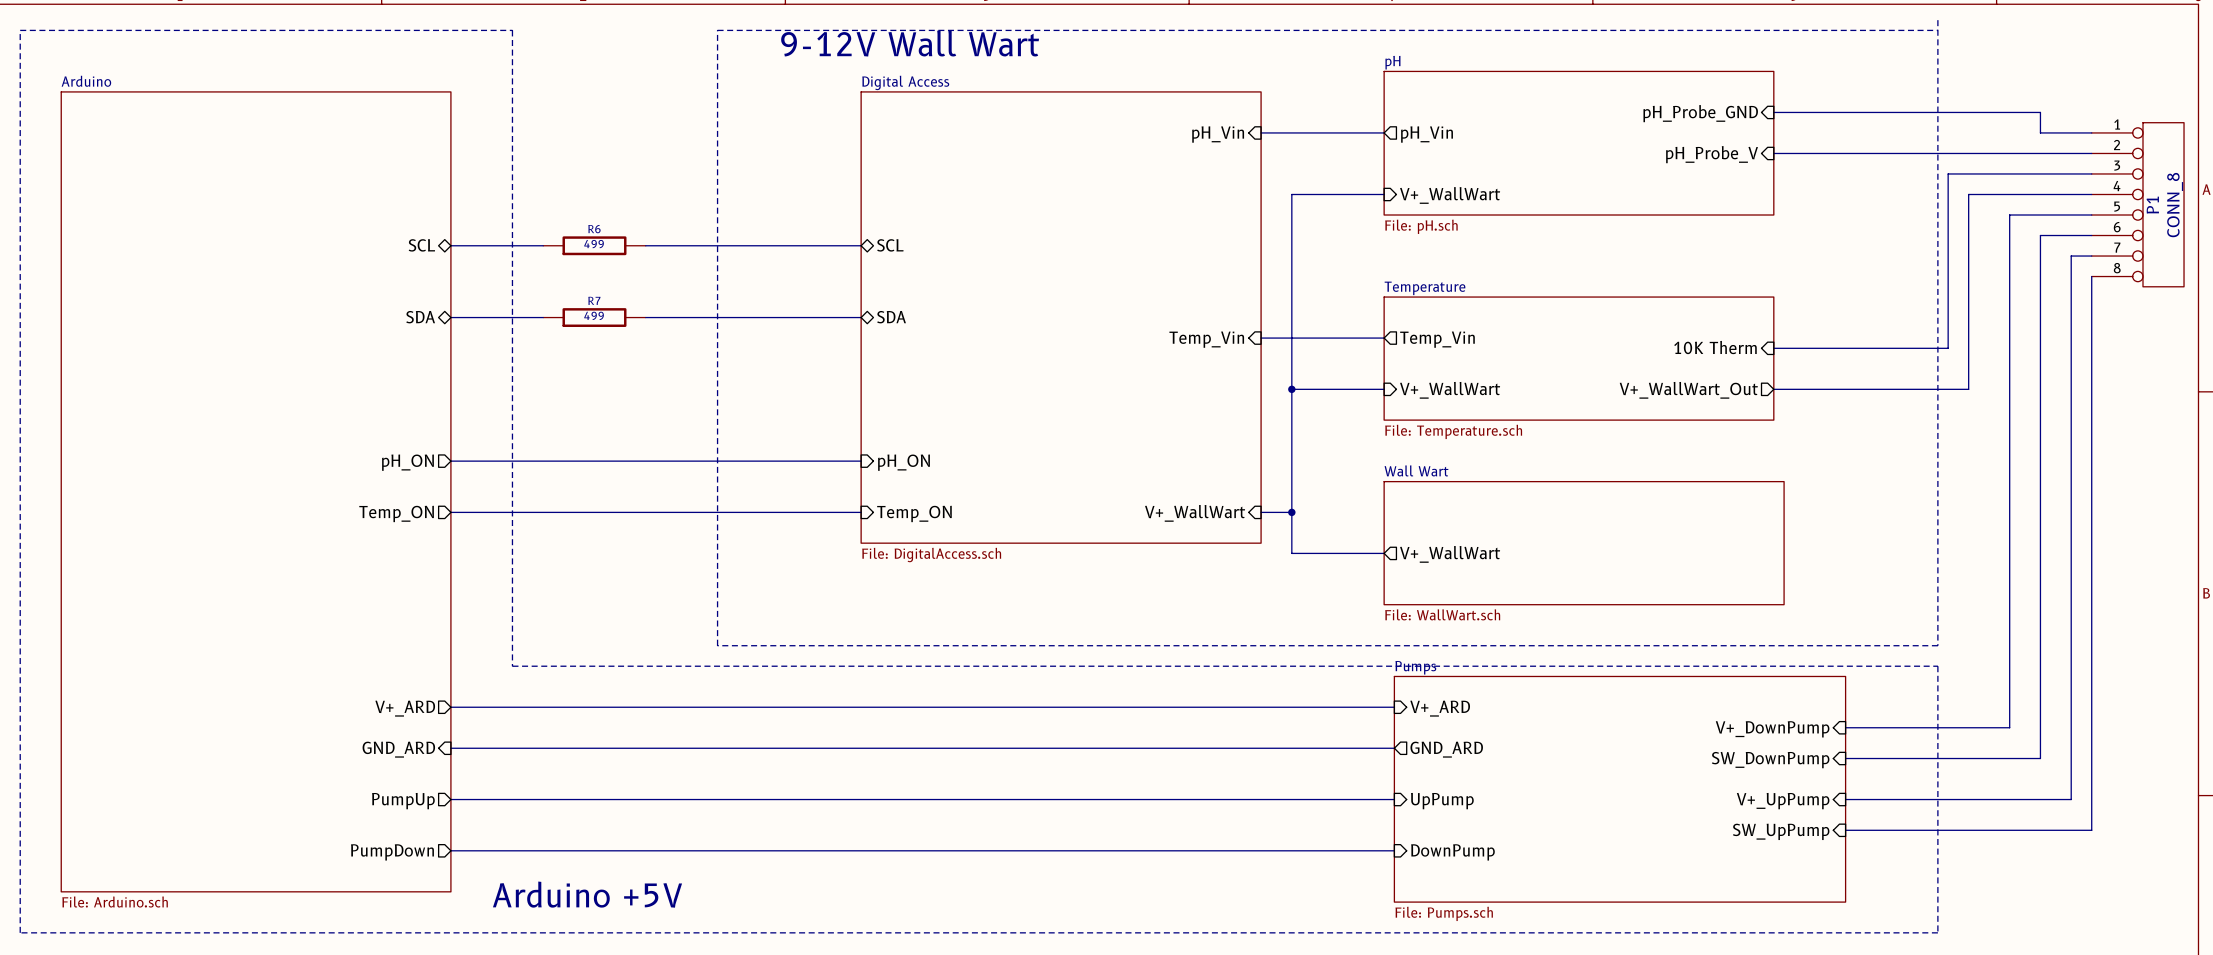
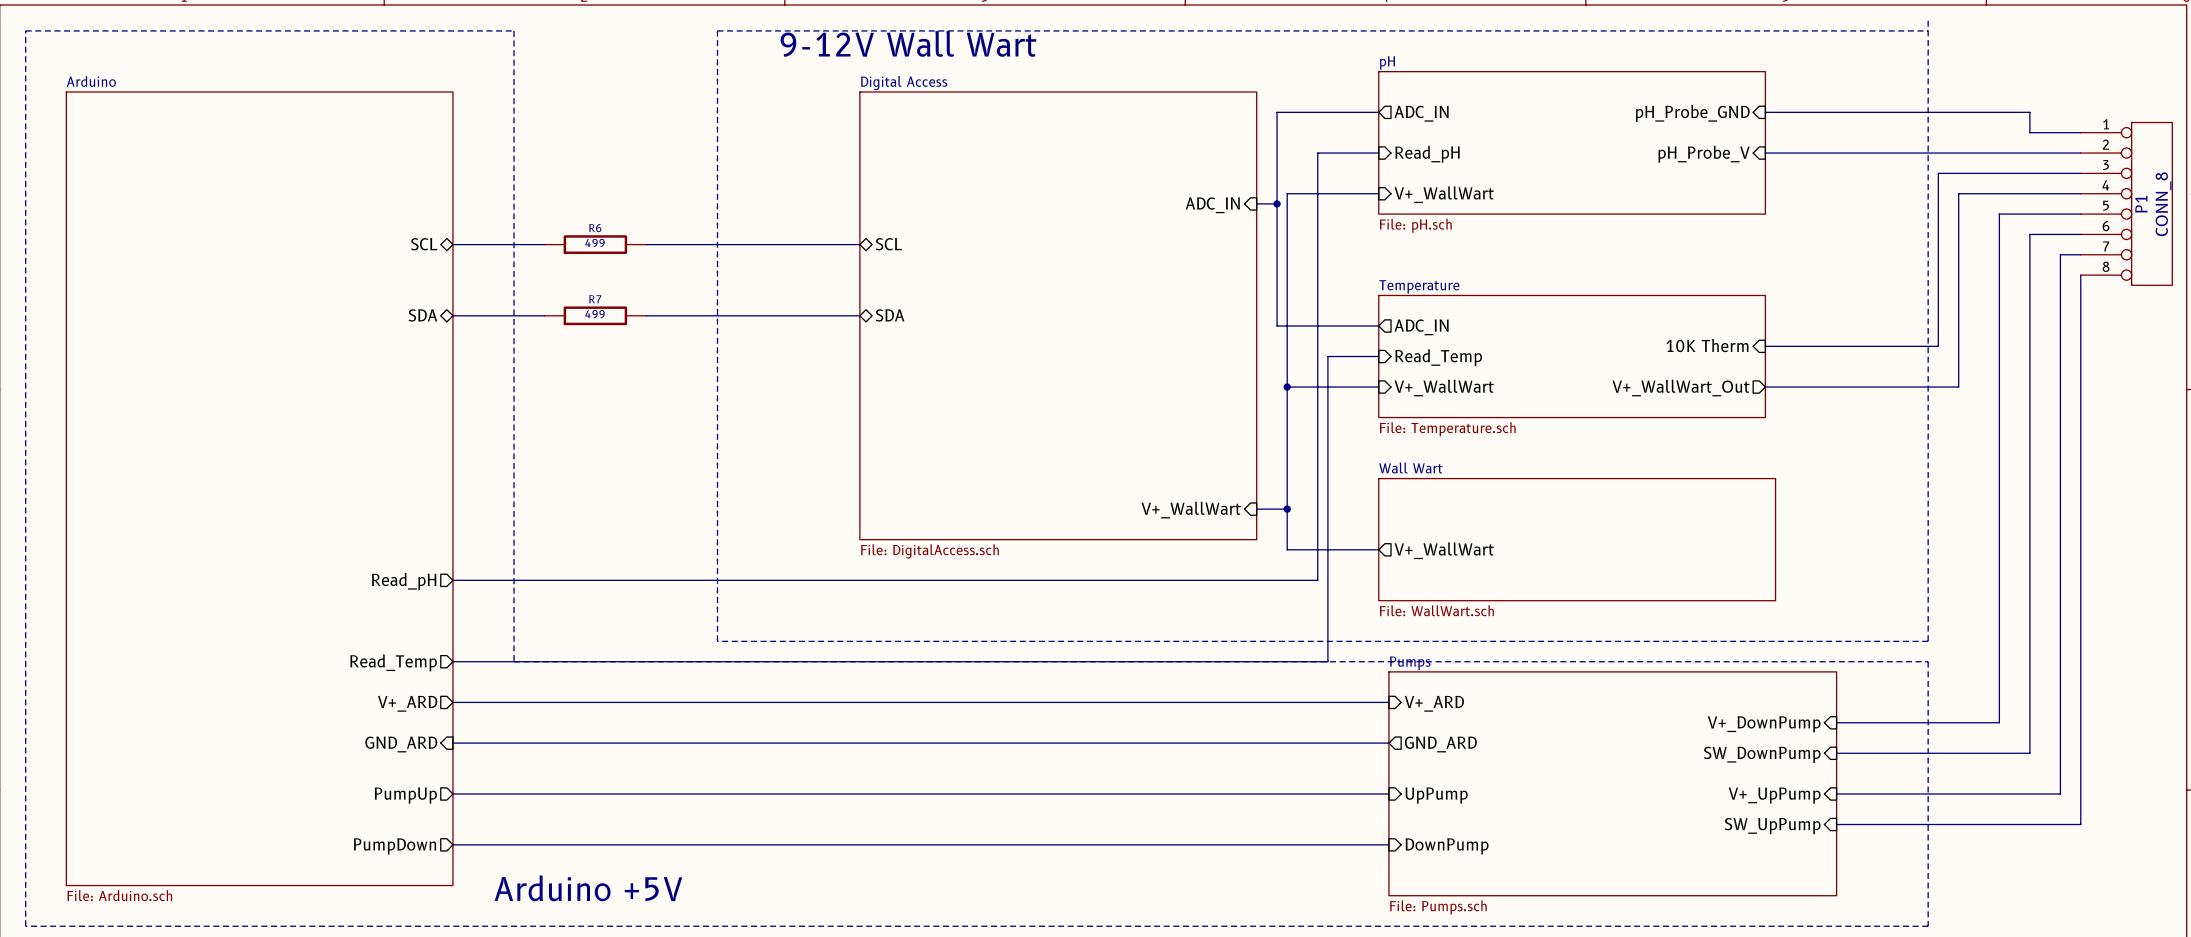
wire: none -> (1378, 112) (1277, 112) (1277, 325) (1378, 325)
sheet pin: none -> ADC_IN (1421, 113)
wire: (1261, 132) (1384, 132) -> none
sheet pin: pH_Vin (1218, 134) -> none
sheet pin: pH_Vin (1427, 134) -> none
wire: none -> (1378, 153) (1317, 153) (1317, 580) (452, 580)
sheet pin: none -> Read_pH (1427, 154)
wire: none -> (1256, 203) (1277, 203)
junction: none -> (1277, 203)
sheet pin: none -> ADC_IN (1212, 205)
sheet pin: none -> ADC_IN (1421, 327)
wire: (1261, 338) (1384, 338) -> none
sheet pin: Temp_Vin (1206, 339) -> none
sheet pin: Temp_Vin (1437, 339) -> none
wire: none -> (1378, 356) (1327, 356) (1327, 661) (452, 661)
sheet pin: none -> Read_Temp (1438, 357)
wire: (450, 461) (861, 461) -> none
sheet pin: pH_ON (408, 462) -> none
sheet pin: pH_ON (904, 462) -> none
wire: (450, 512) (861, 512) -> none
sheet pin: Temp_ON (396, 513) -> none
sheet pin: Temp_ON (914, 513) -> none
sheet pin: none -> Read_pH (404, 581)
sheet pin: none -> Read_Temp (393, 662)

